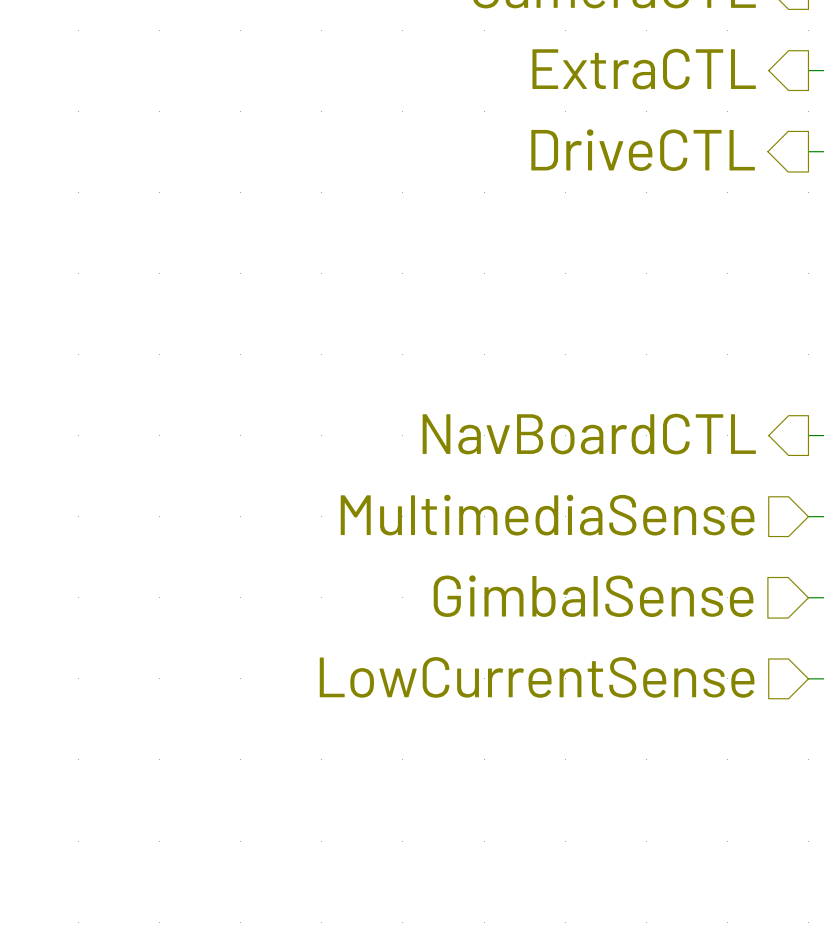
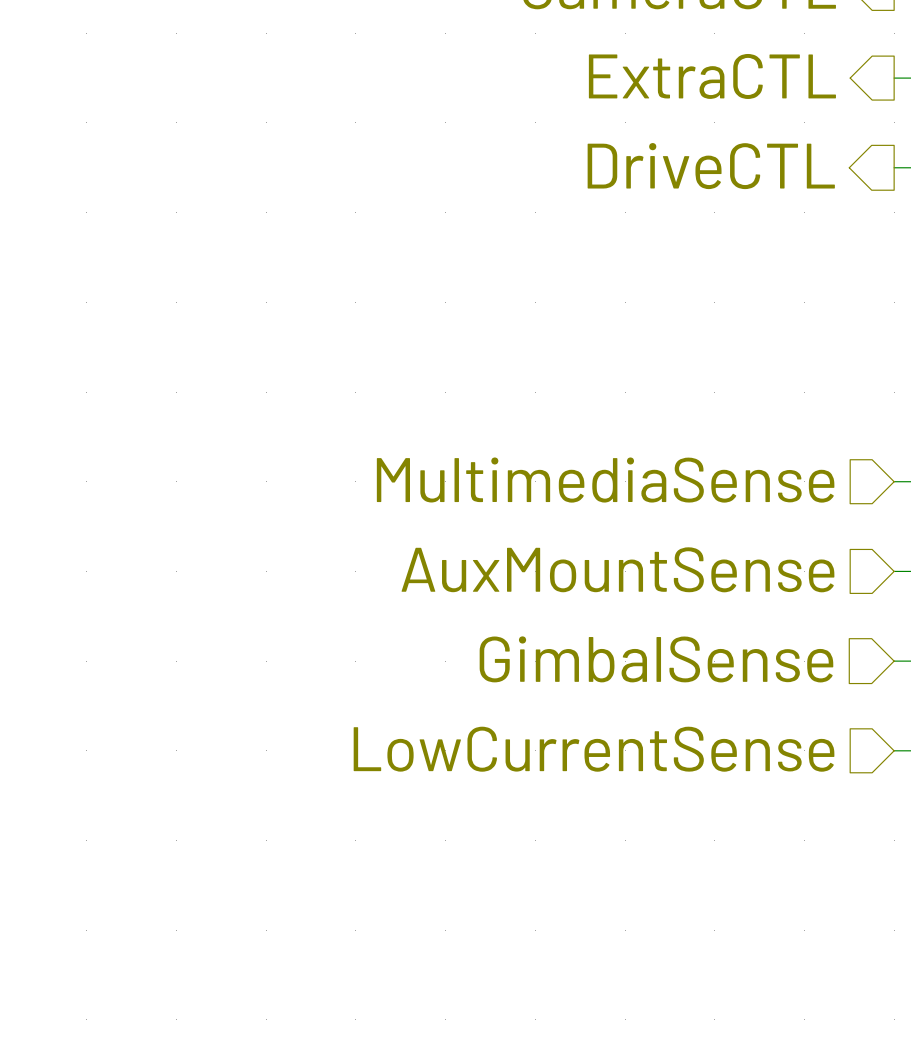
hierarchical label shape: output (589, 434) -> input (605, 480)
hierarchical label: NavBoardCTL (589, 434) -> MultimediaSense (605, 480)
hierarchical label: MultimediaSense (547, 515) -> AuxMountSense (617, 569)

